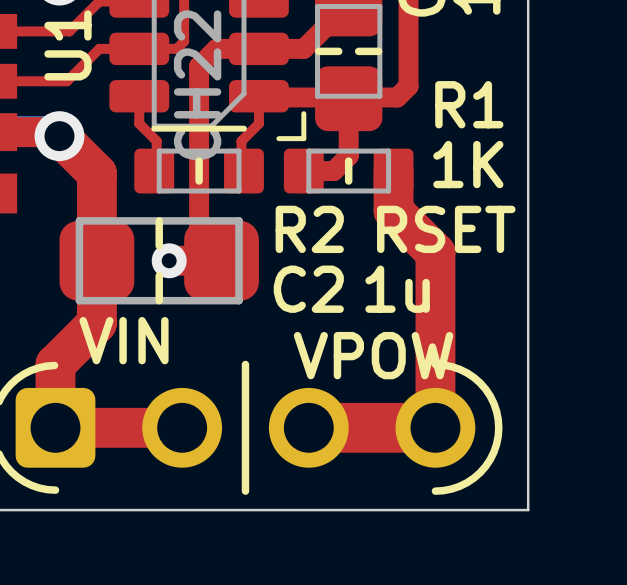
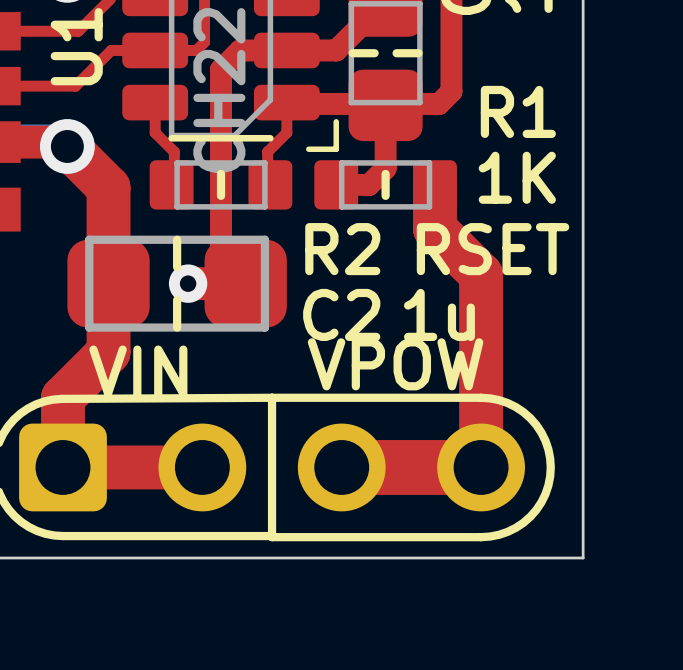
text position: VPOW (373, 355) -> VPOW (395, 364)
line: none -> (481, 397) (61, 398)
line: none -> (62, 536) (272, 536)
line: none -> (272, 537) (481, 537)

